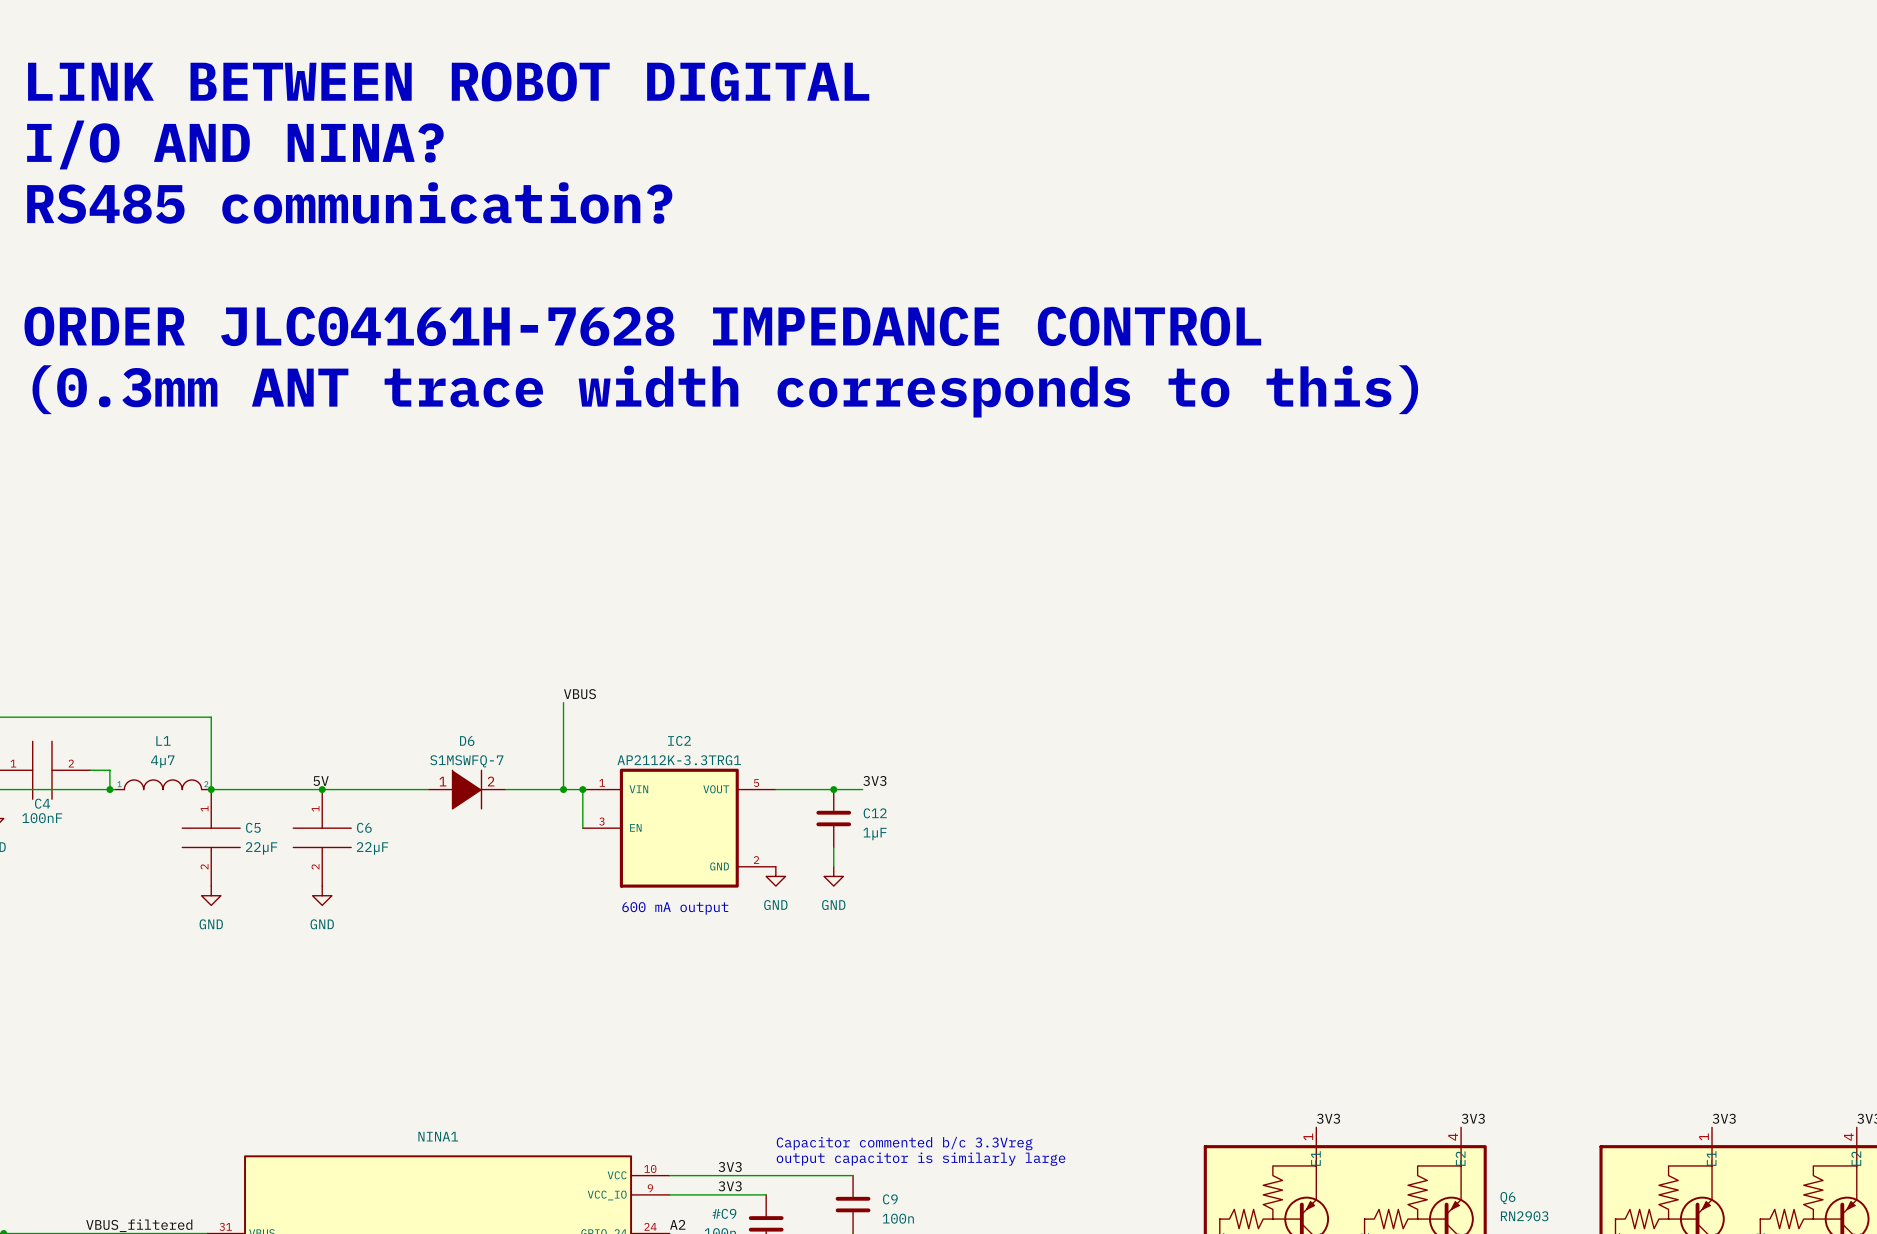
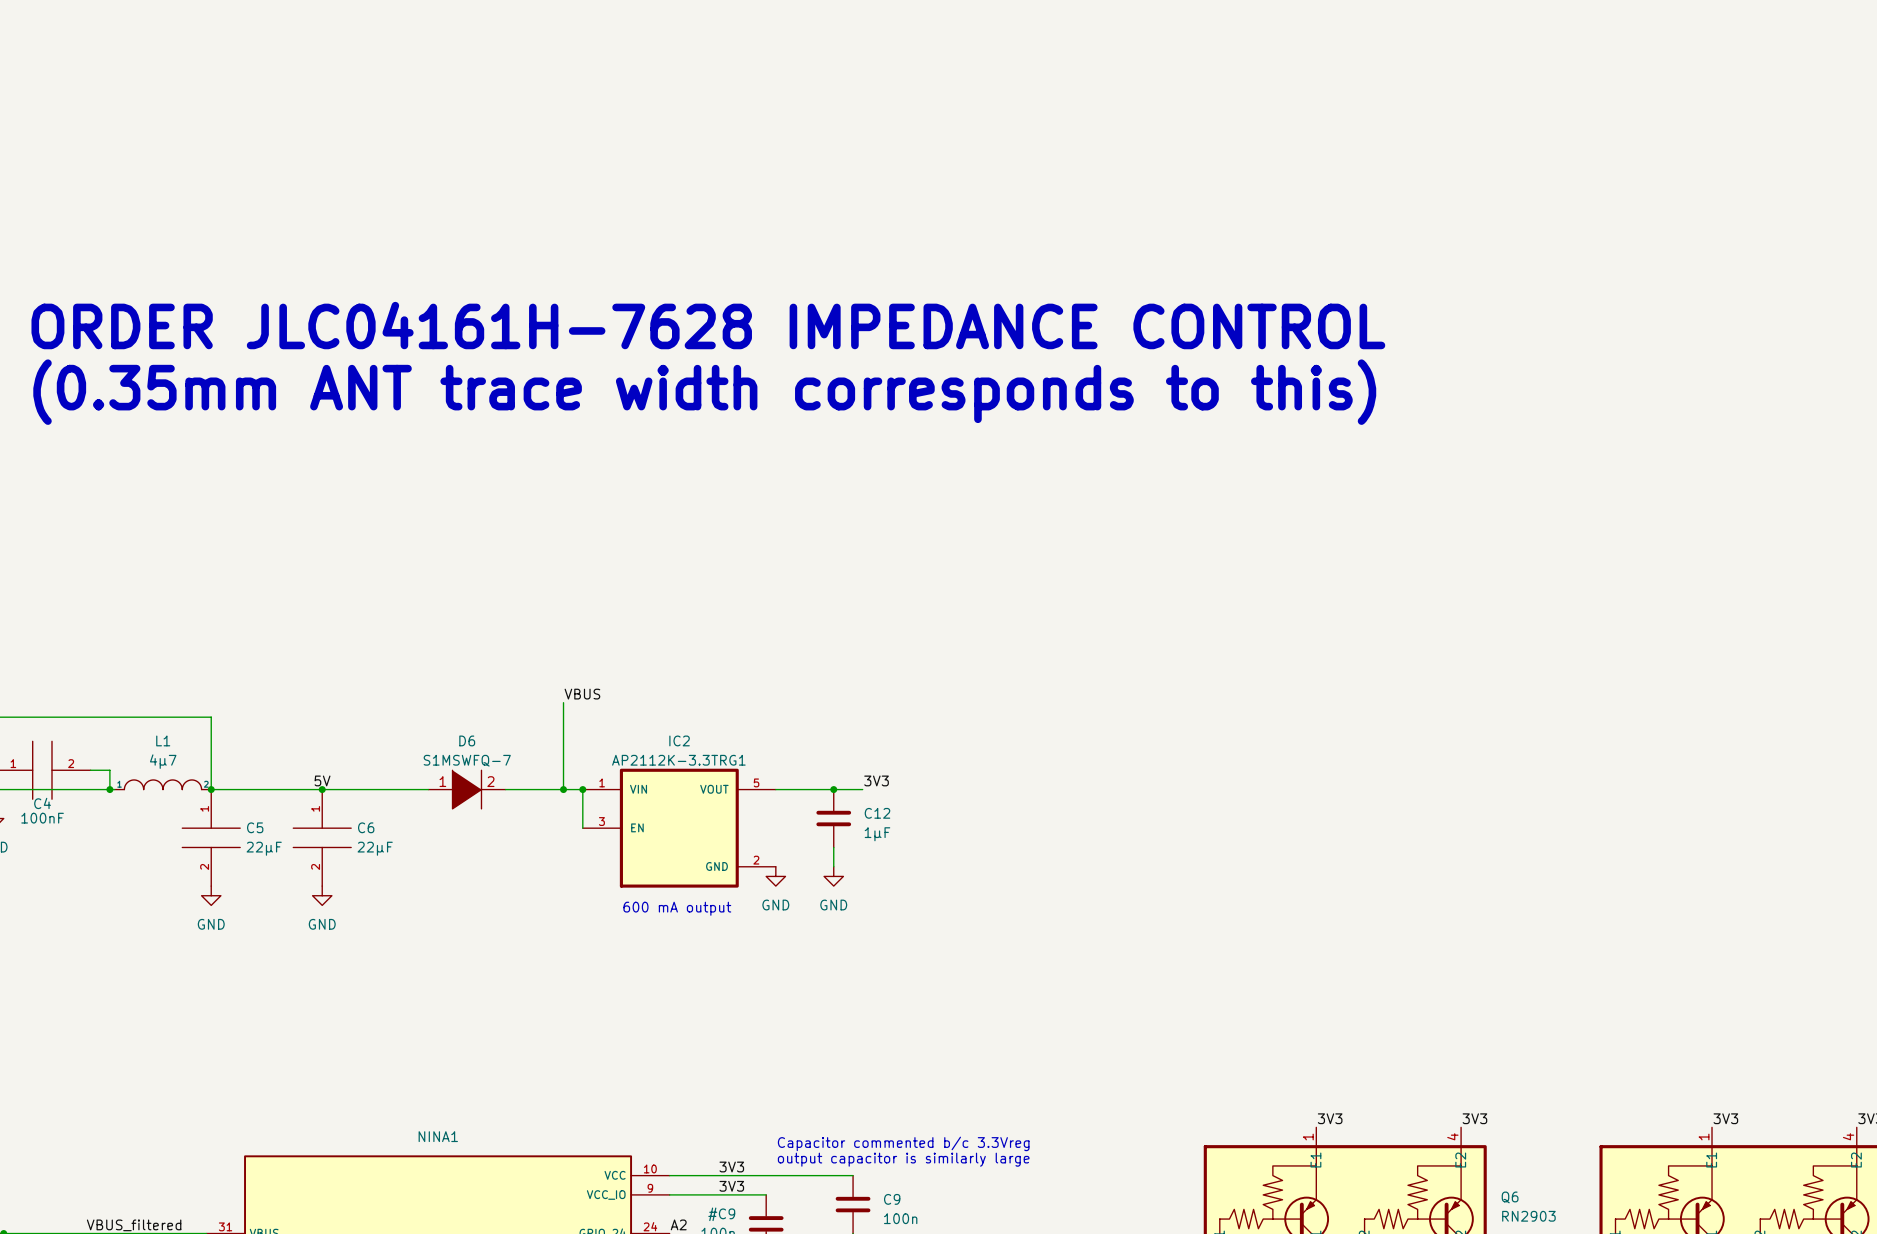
text: LINK BETWEEN ROBOT DIGITAL (448, 81) -> none
text: I/O AND NINA? (235, 144) -> none
text: RS485 communication? (349, 202) -> none
text: (0.3mm ANT trace width corresponds to this) (725, 391) -> (0.35mm ANT trace width corresponds to this) (704, 392)

